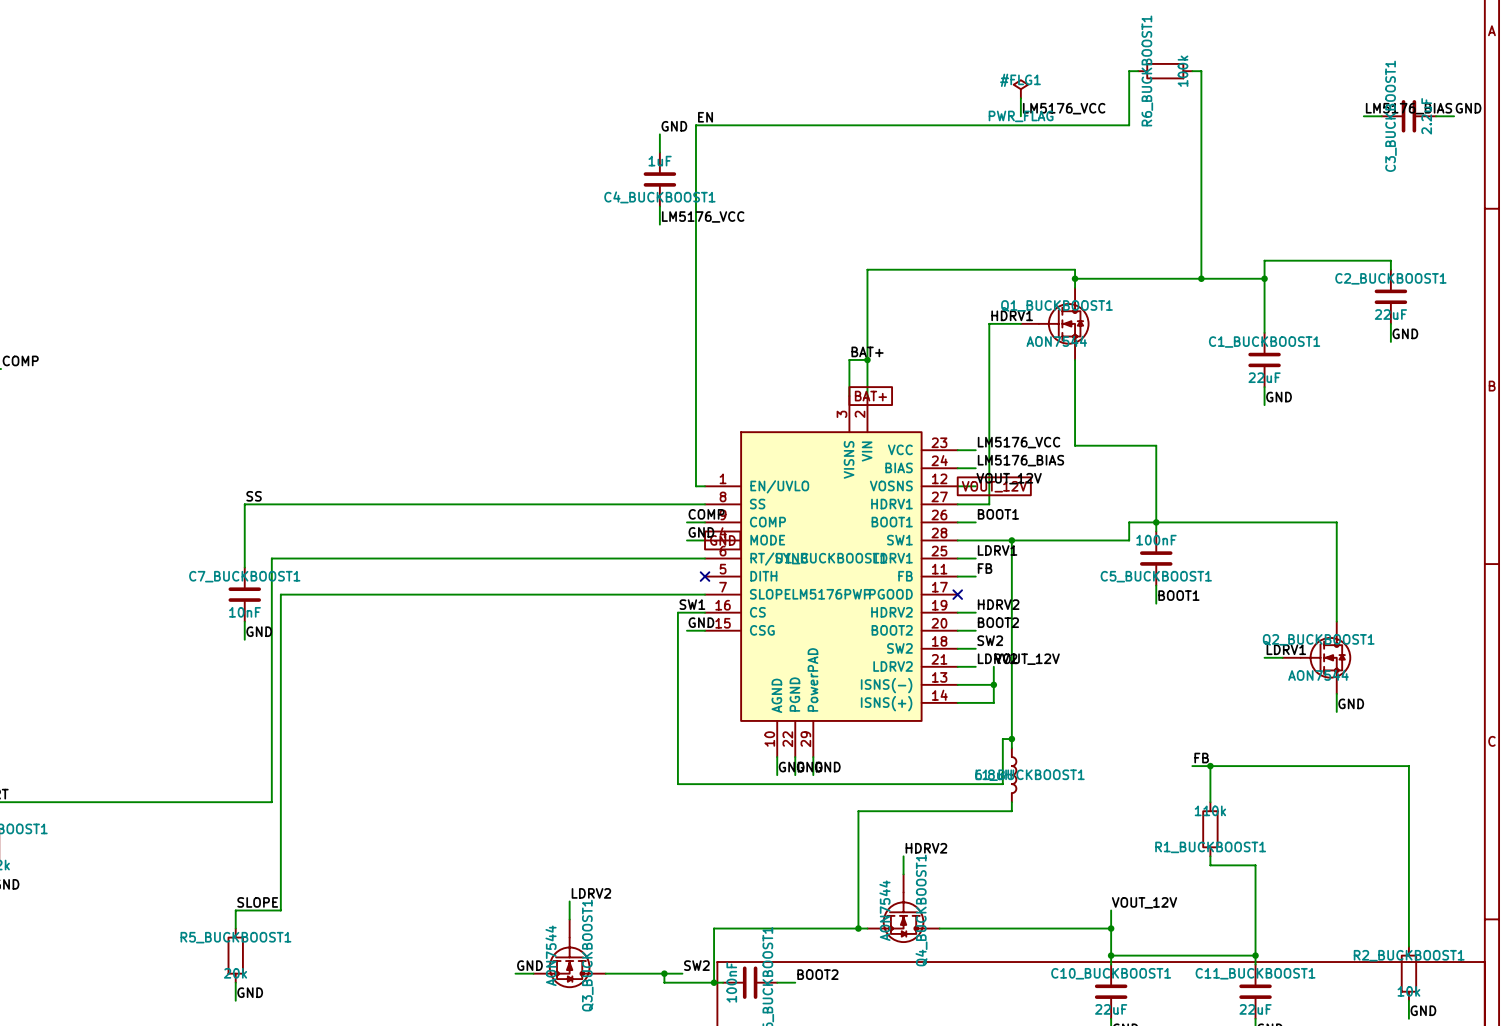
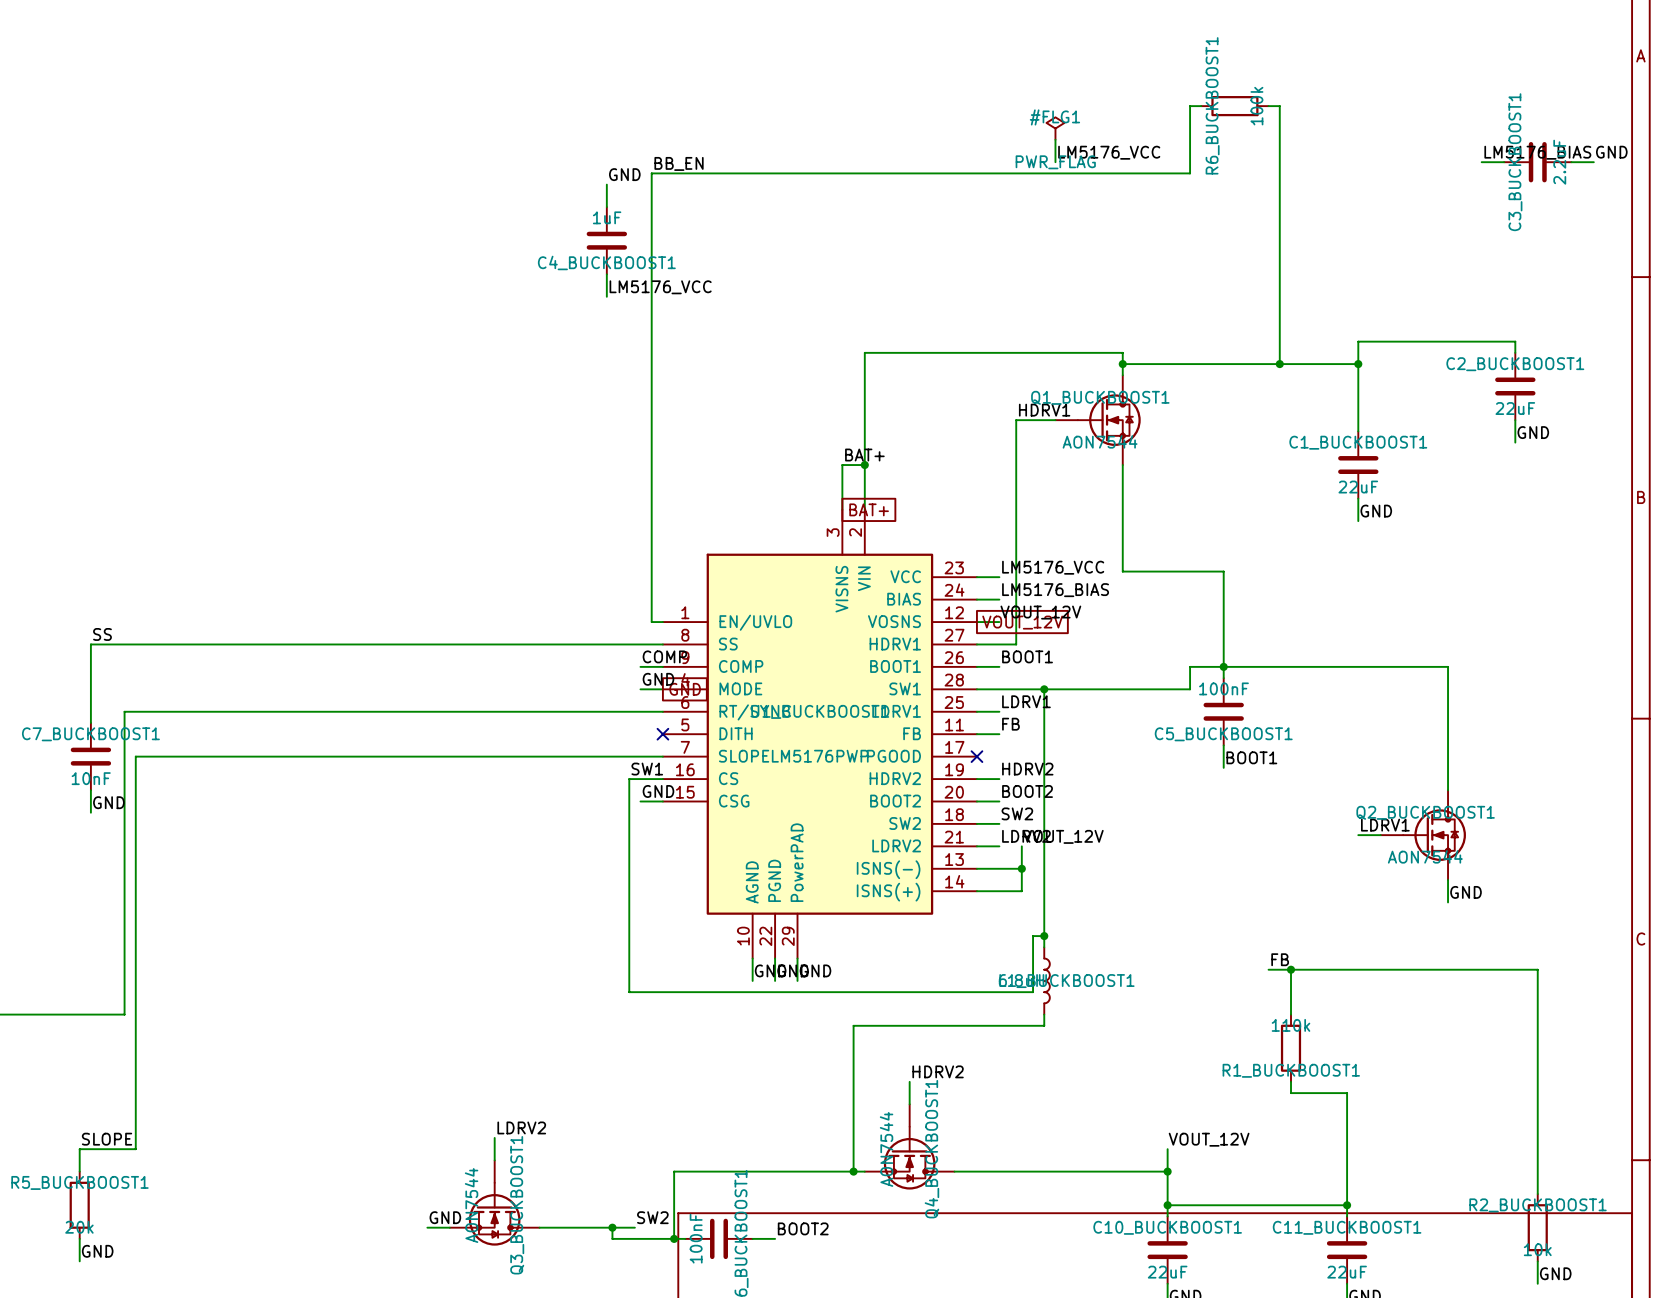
label: EN (705, 117) -> BB_EN (679, 163)

